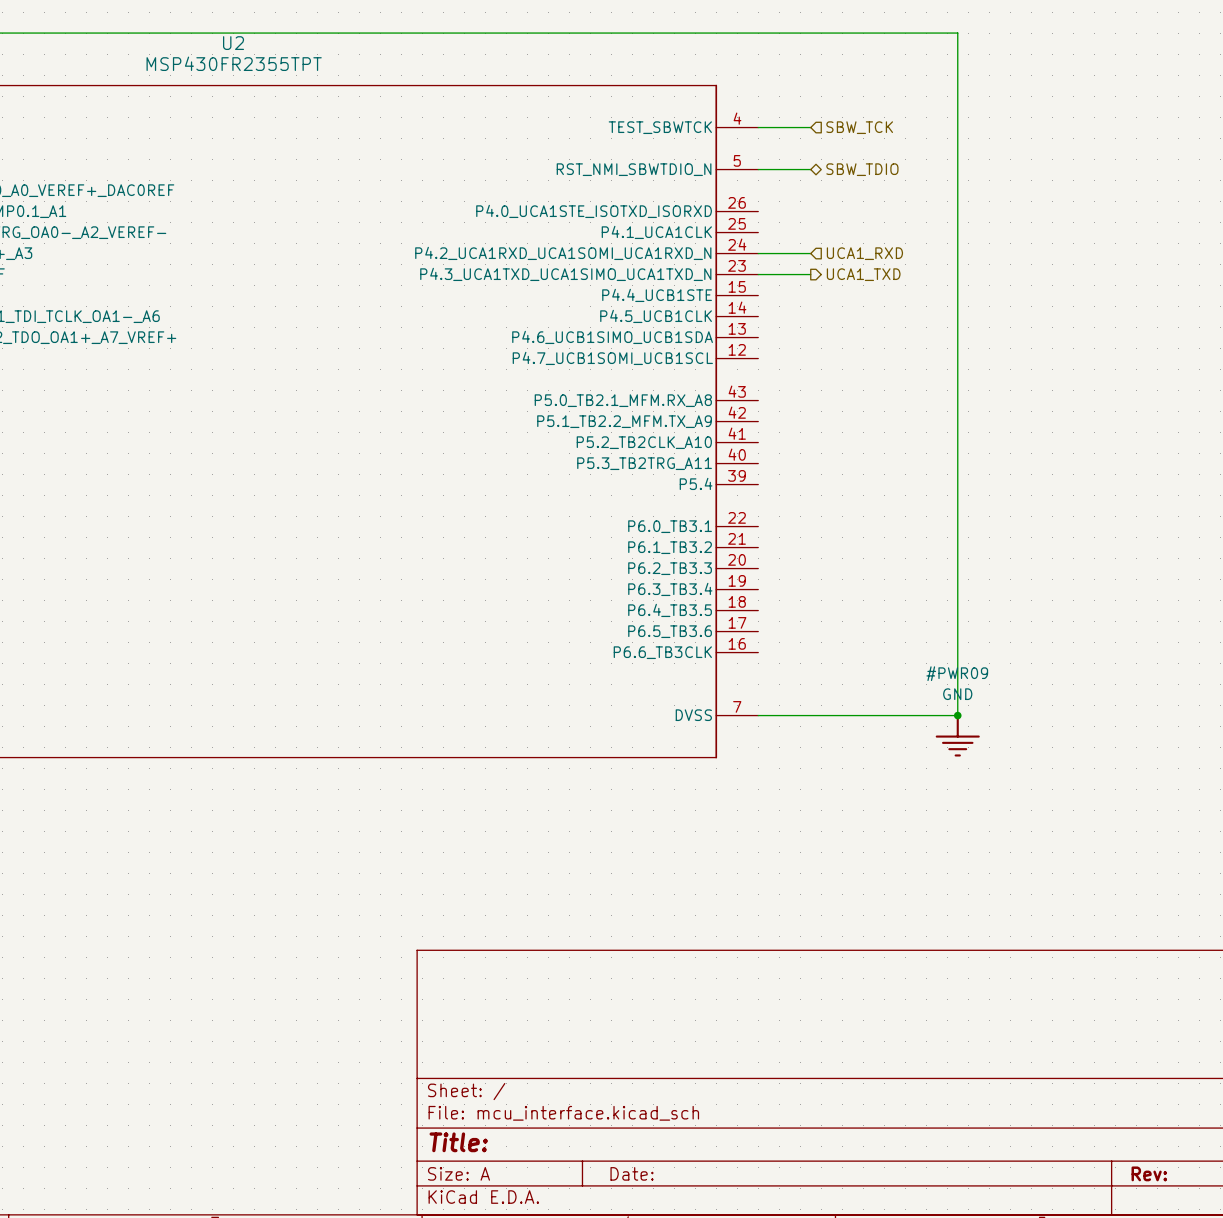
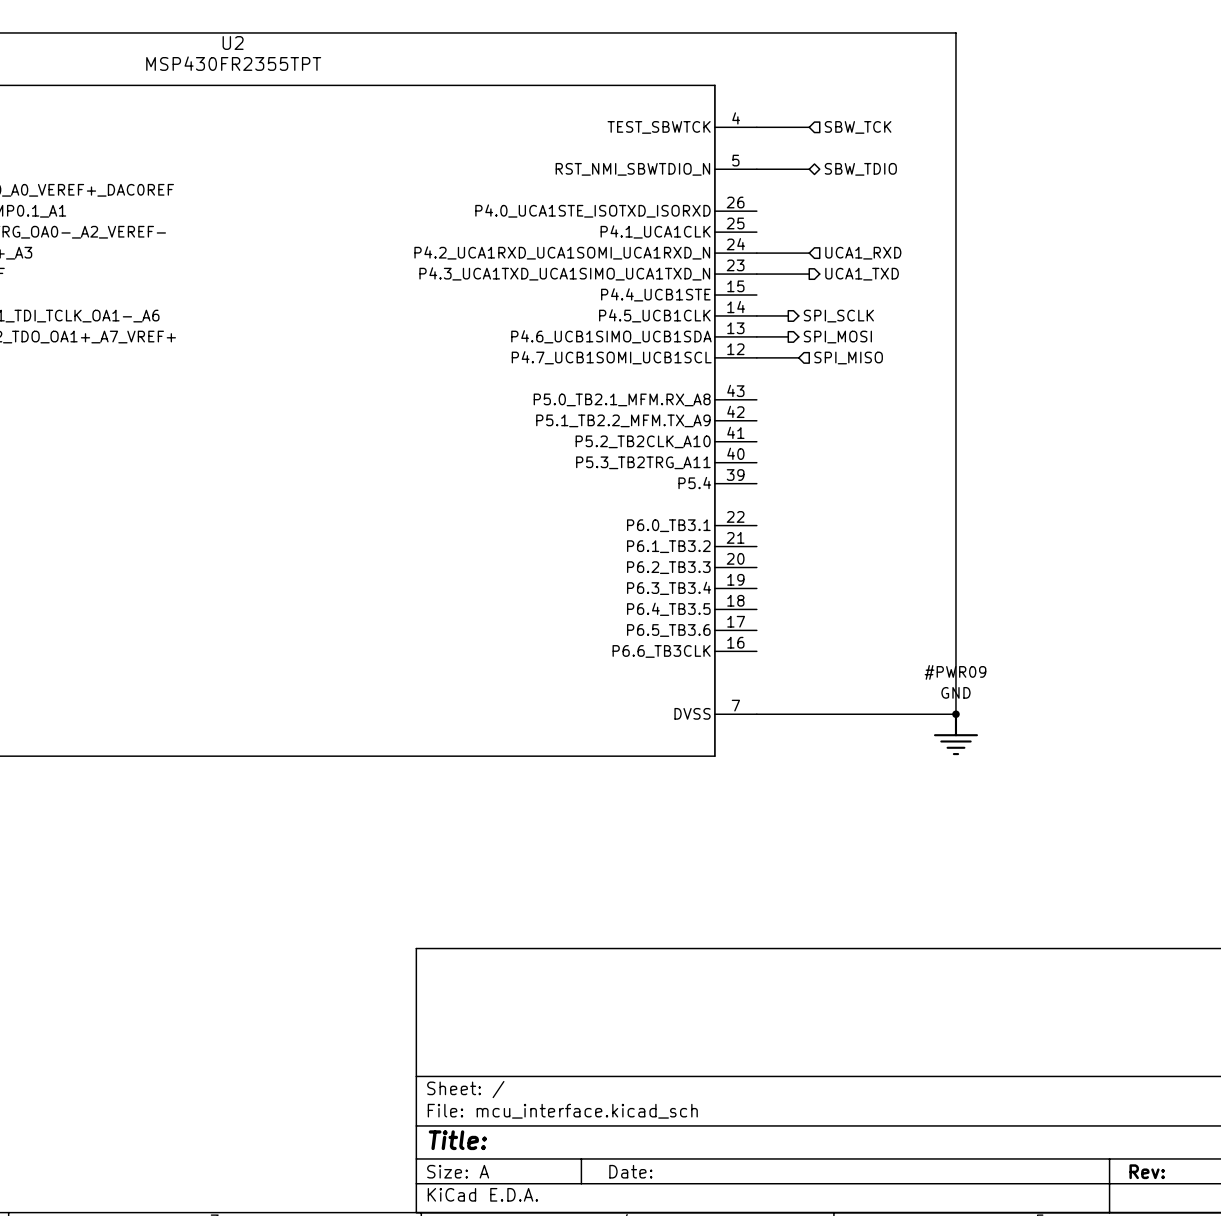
wire: none -> (756, 315) (788, 315)
hierarchical label: none -> SPI_SCLK (838, 316)
wire: none -> (756, 336) (788, 336)
hierarchical label: none -> SPI_MOSI (837, 337)
wire: none -> (756, 357) (798, 357)
hierarchical label: none -> SPI_MISO (848, 358)

